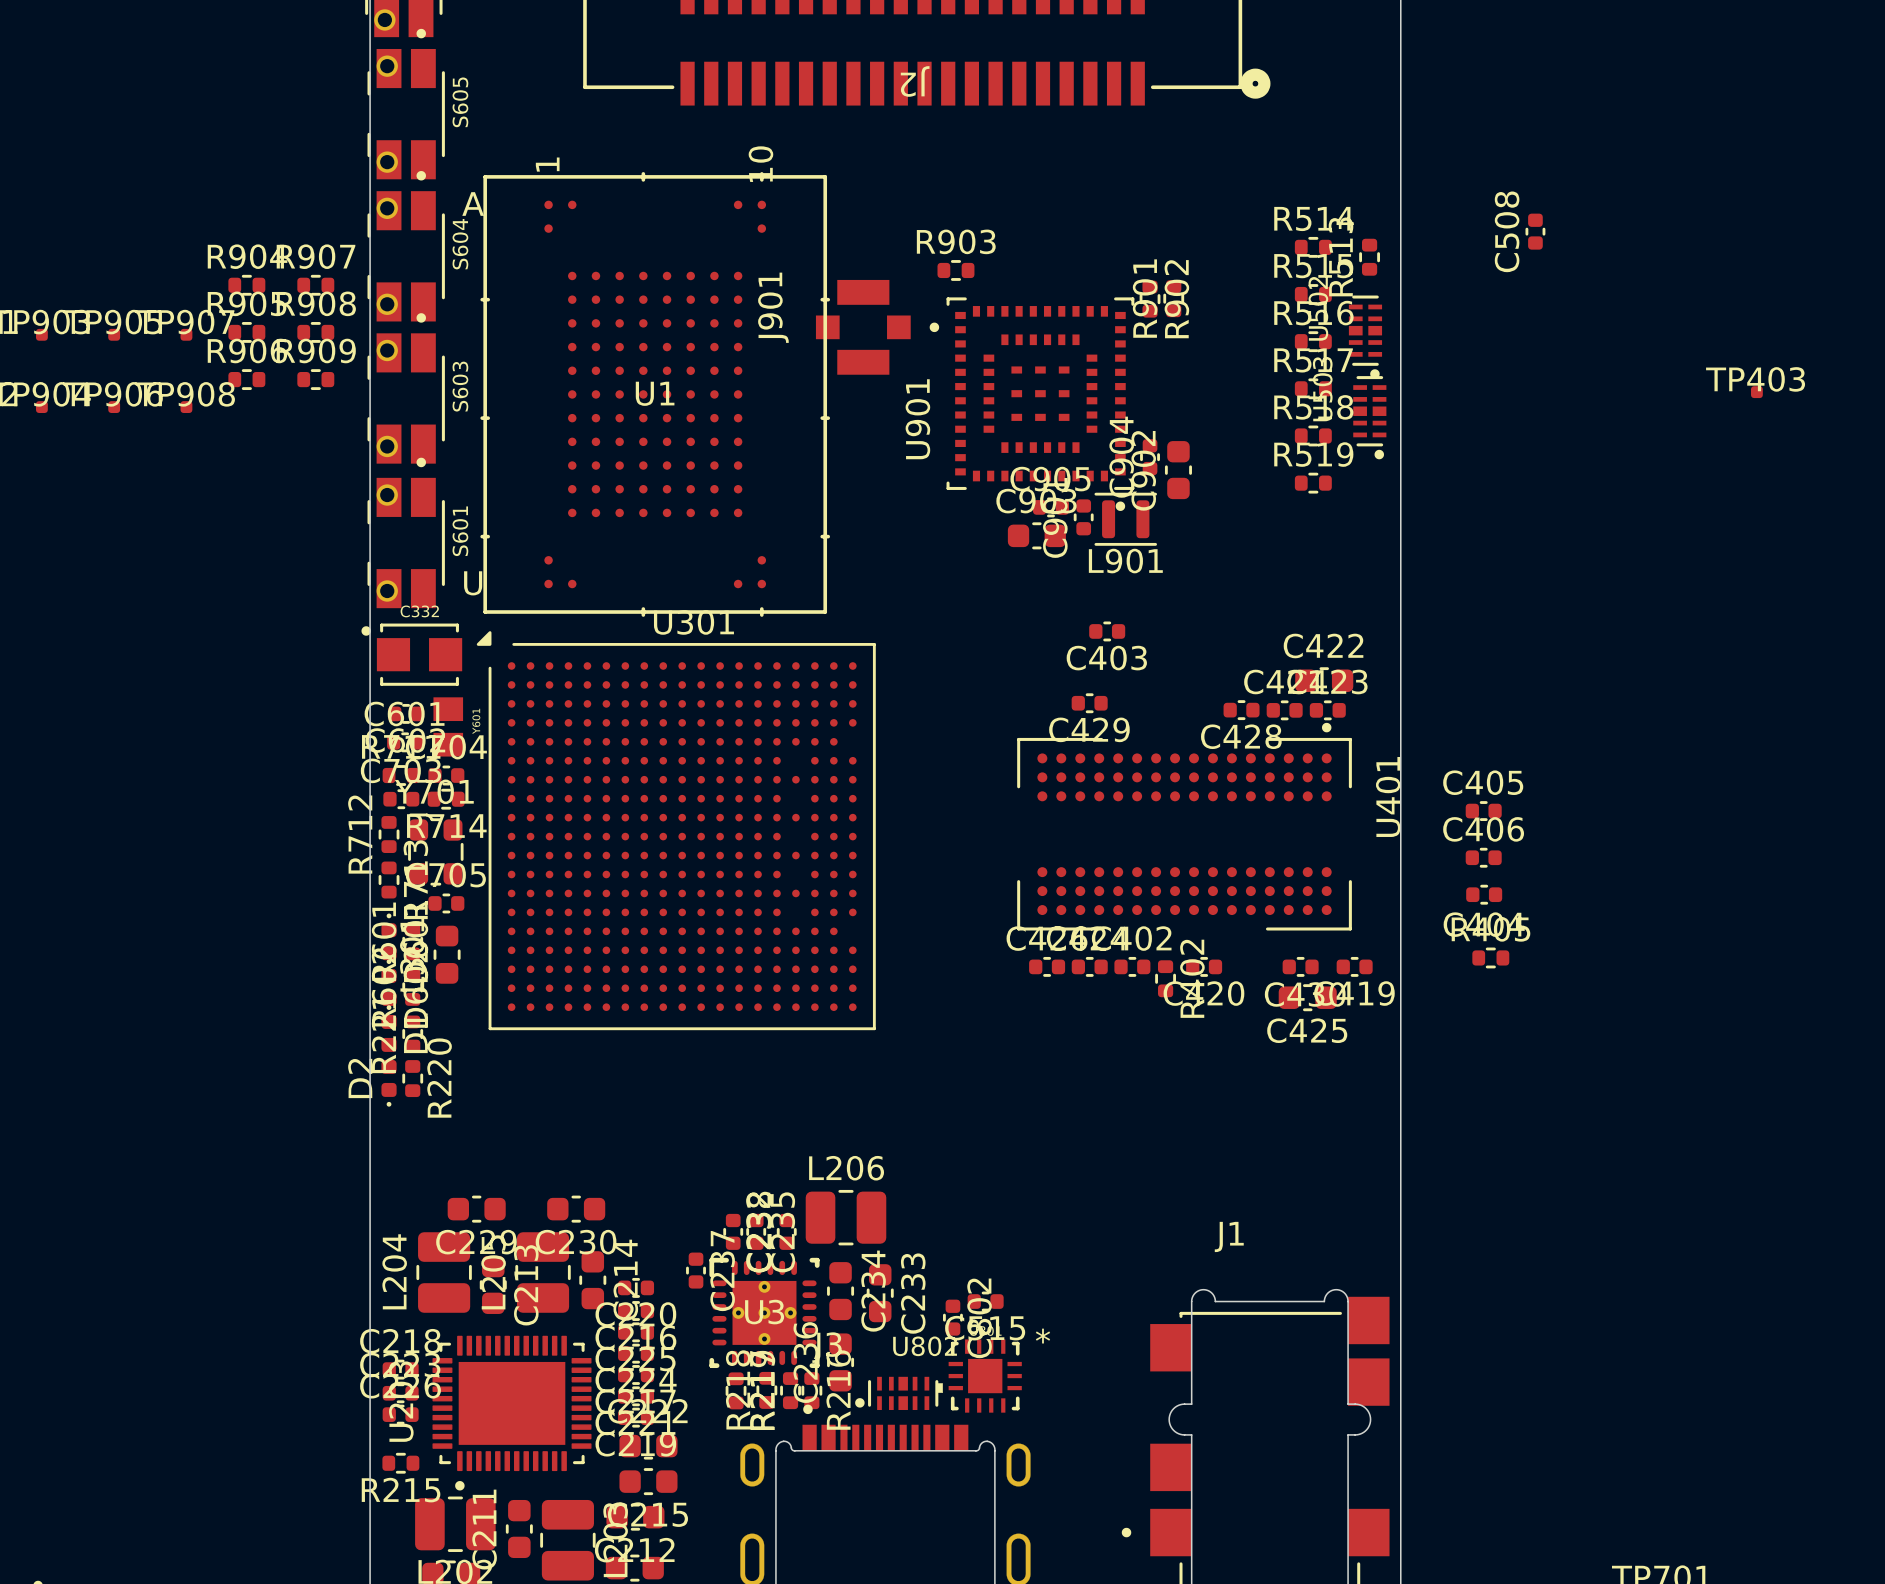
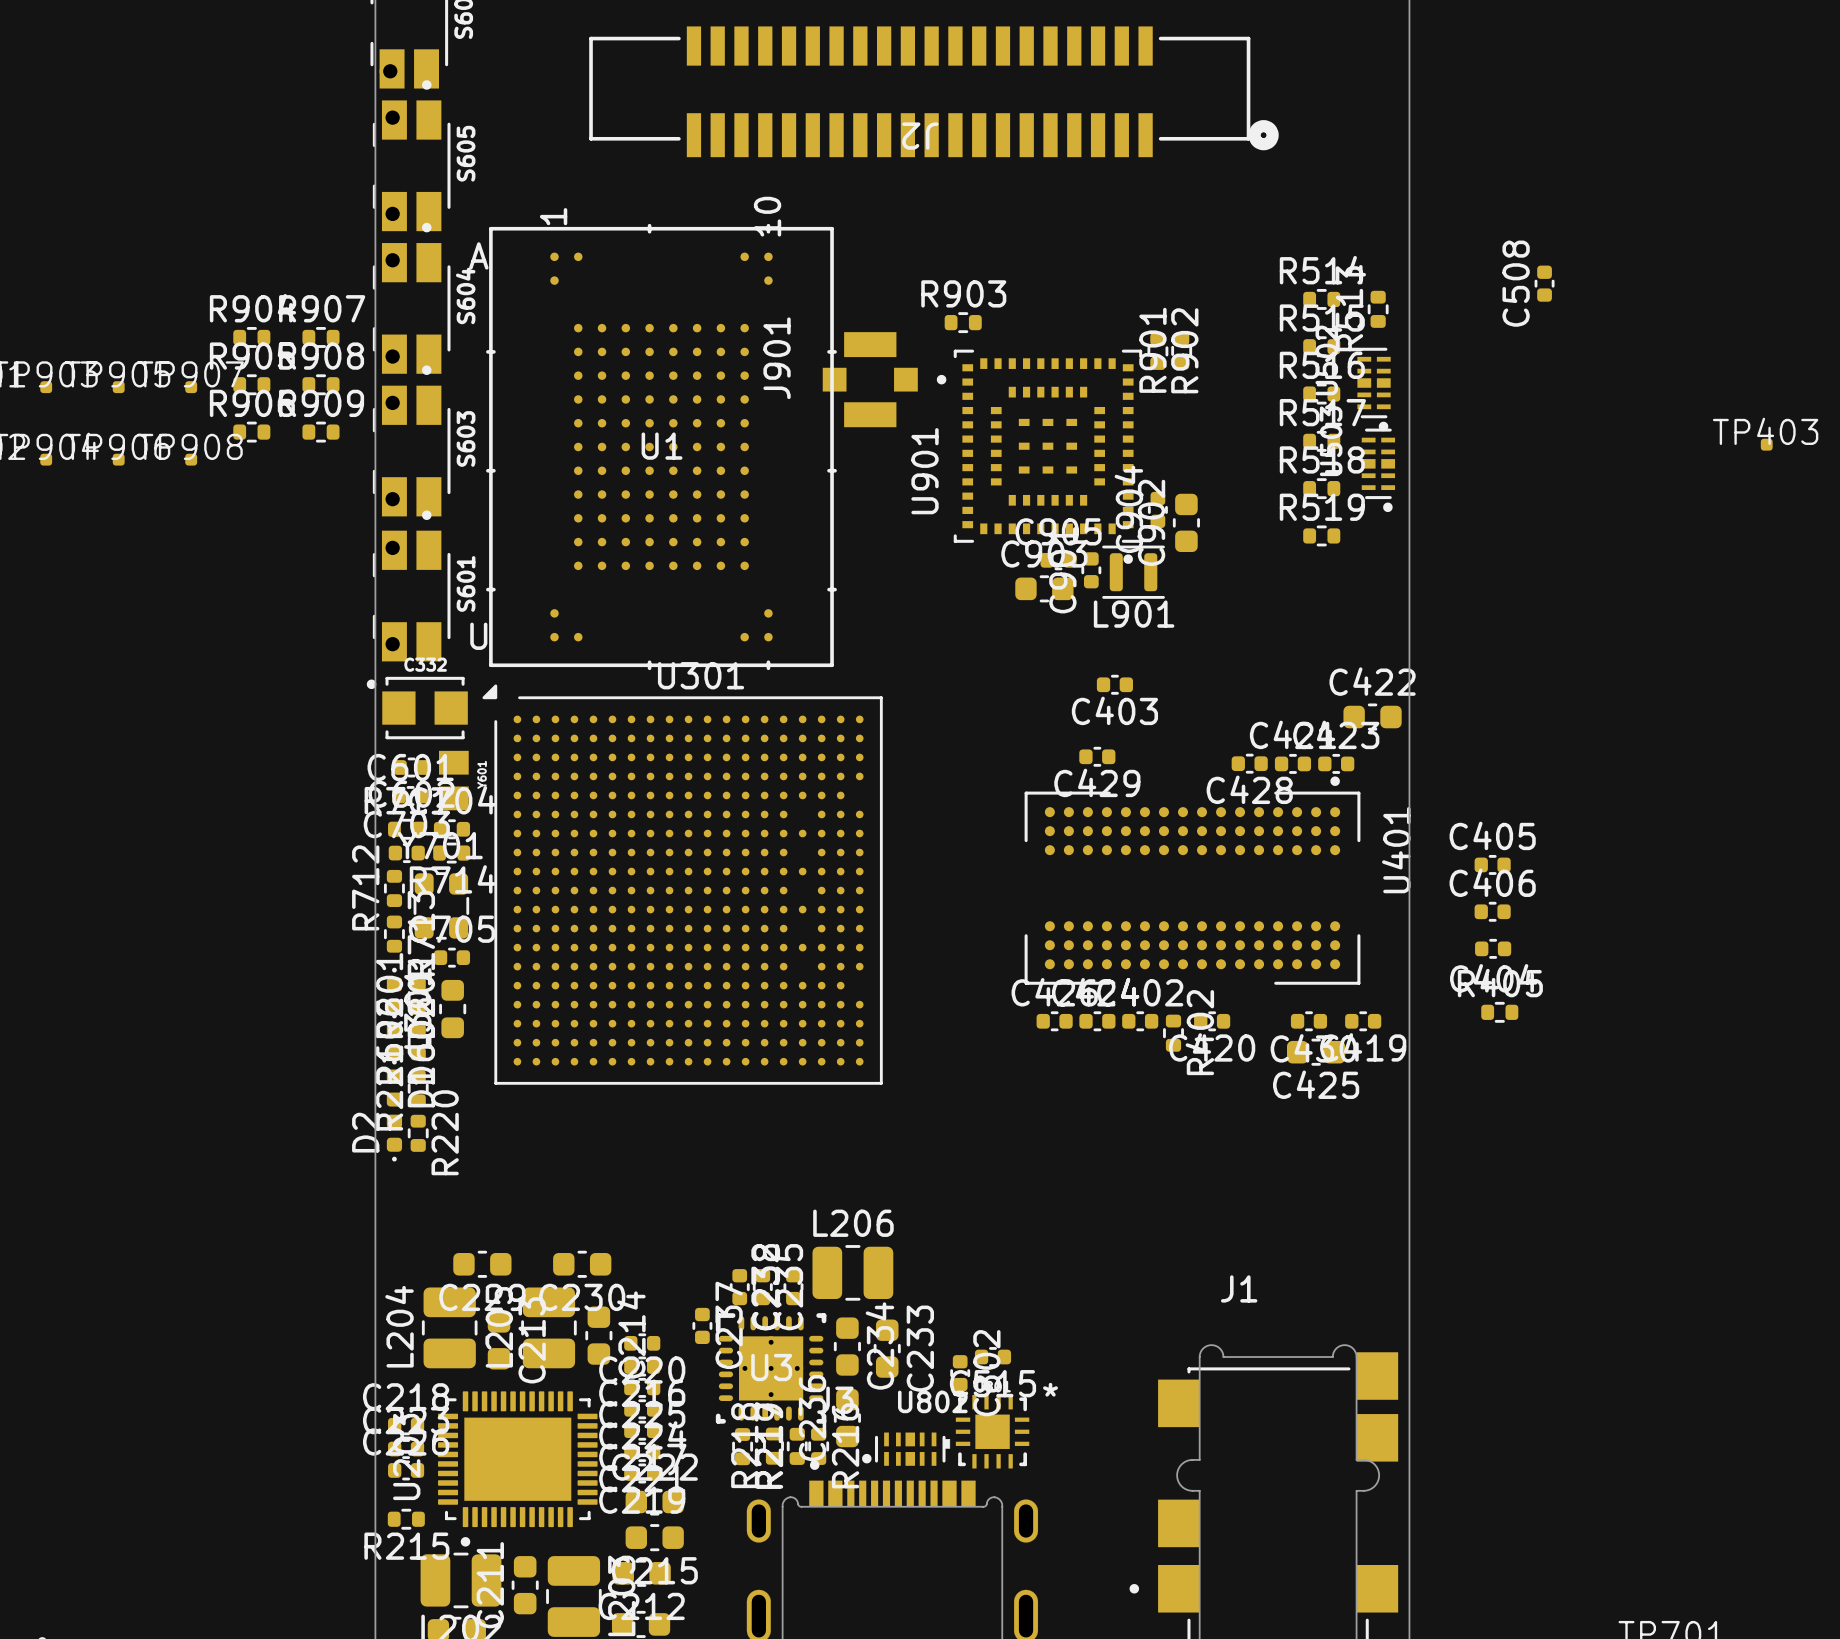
C422 position: (1324, 680) -> (1372, 717)

